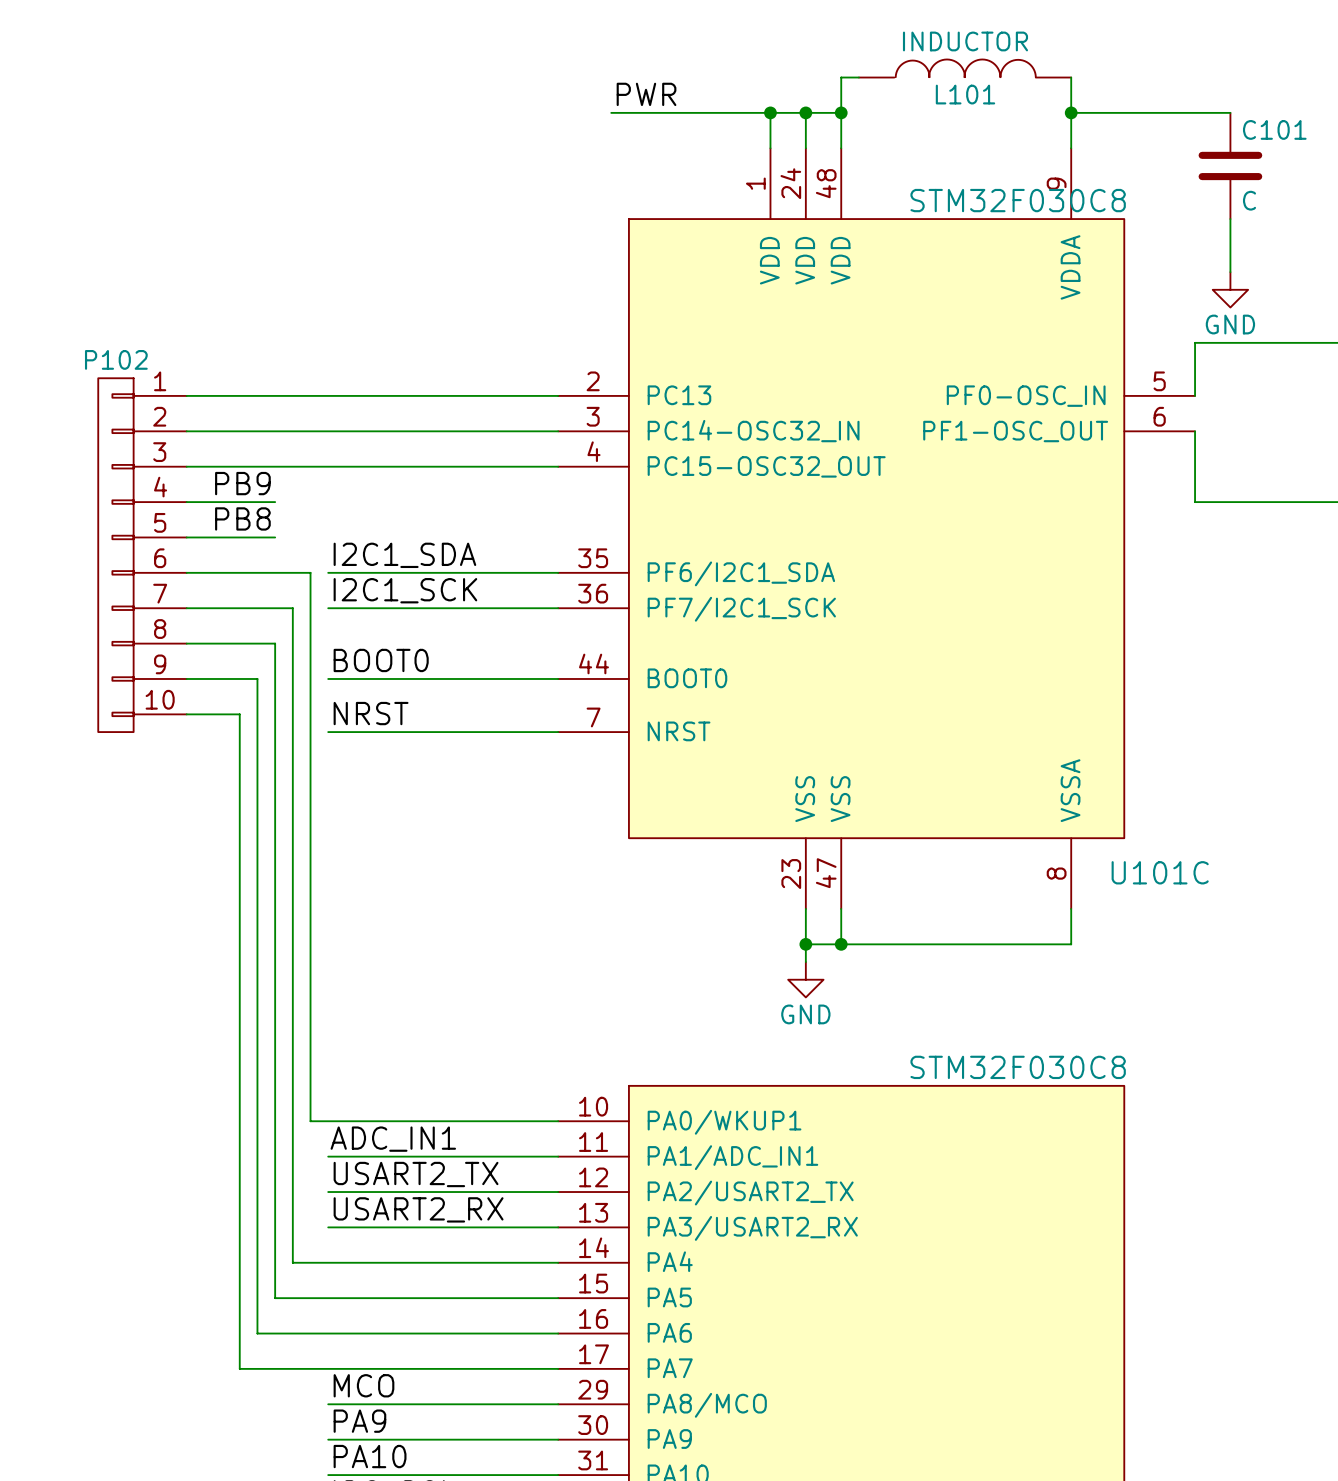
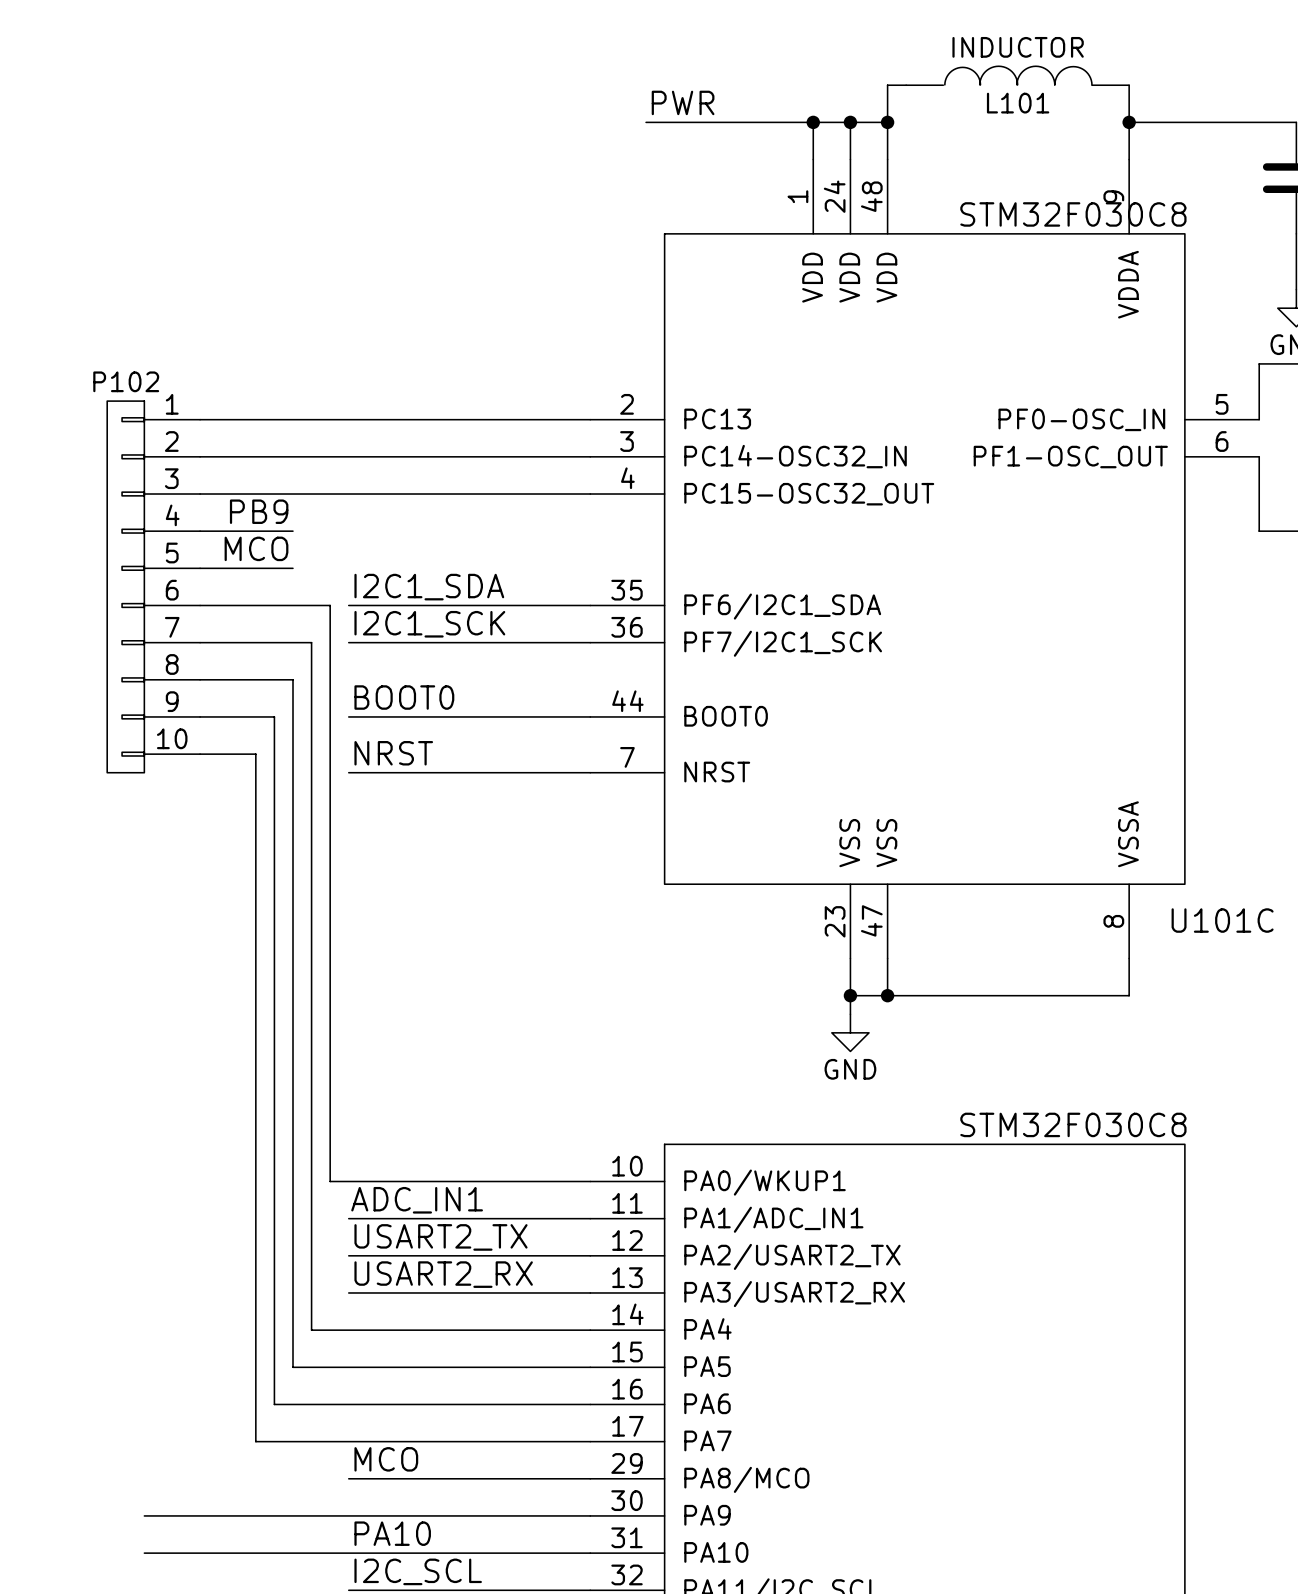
label: PB8 (242, 518) -> MCO (256, 548)
label: PA9 (359, 1421) -> none
wire: none -> (144, 1515) (348, 1515)
wire: none -> (144, 1553) (348, 1553)

